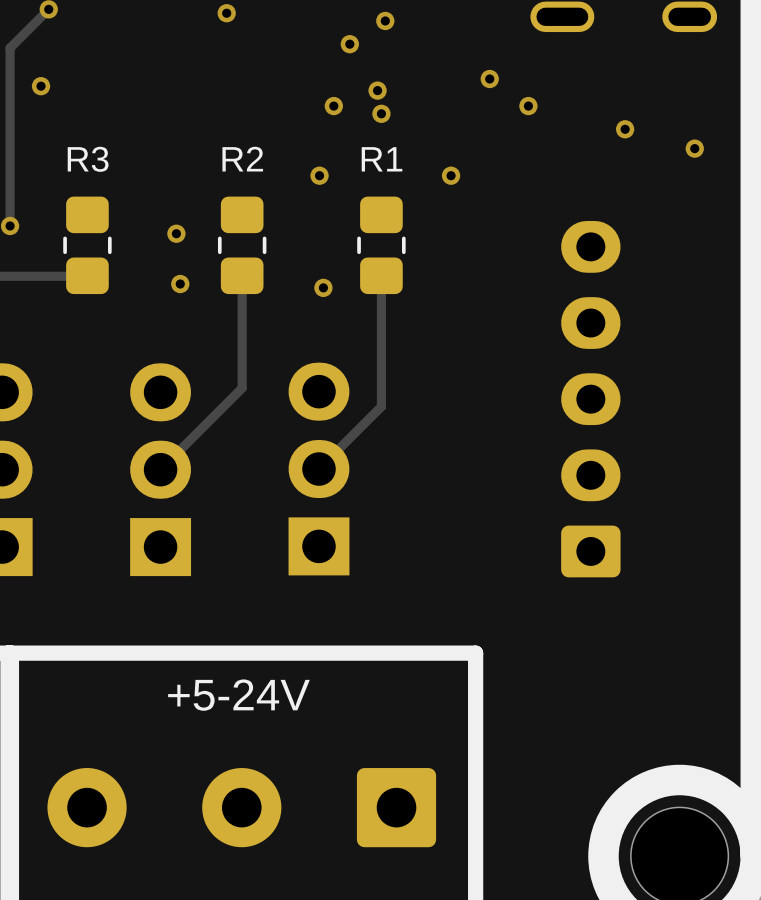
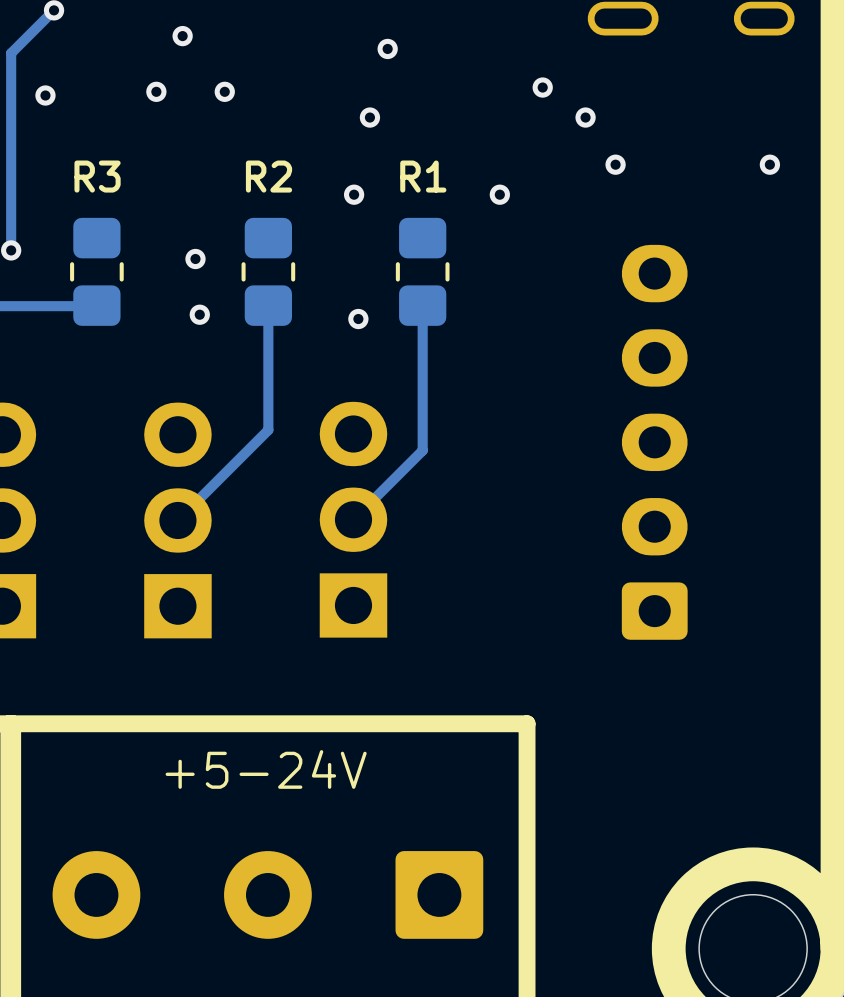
via: (226, 13) -> none
via: (385, 20) -> none
via: none -> (182, 36)
via: none -> (156, 91)
via: none -> (224, 91)
via: (377, 90) -> none
via: (381, 113) -> none
via position: (625, 129) -> (615, 164)

